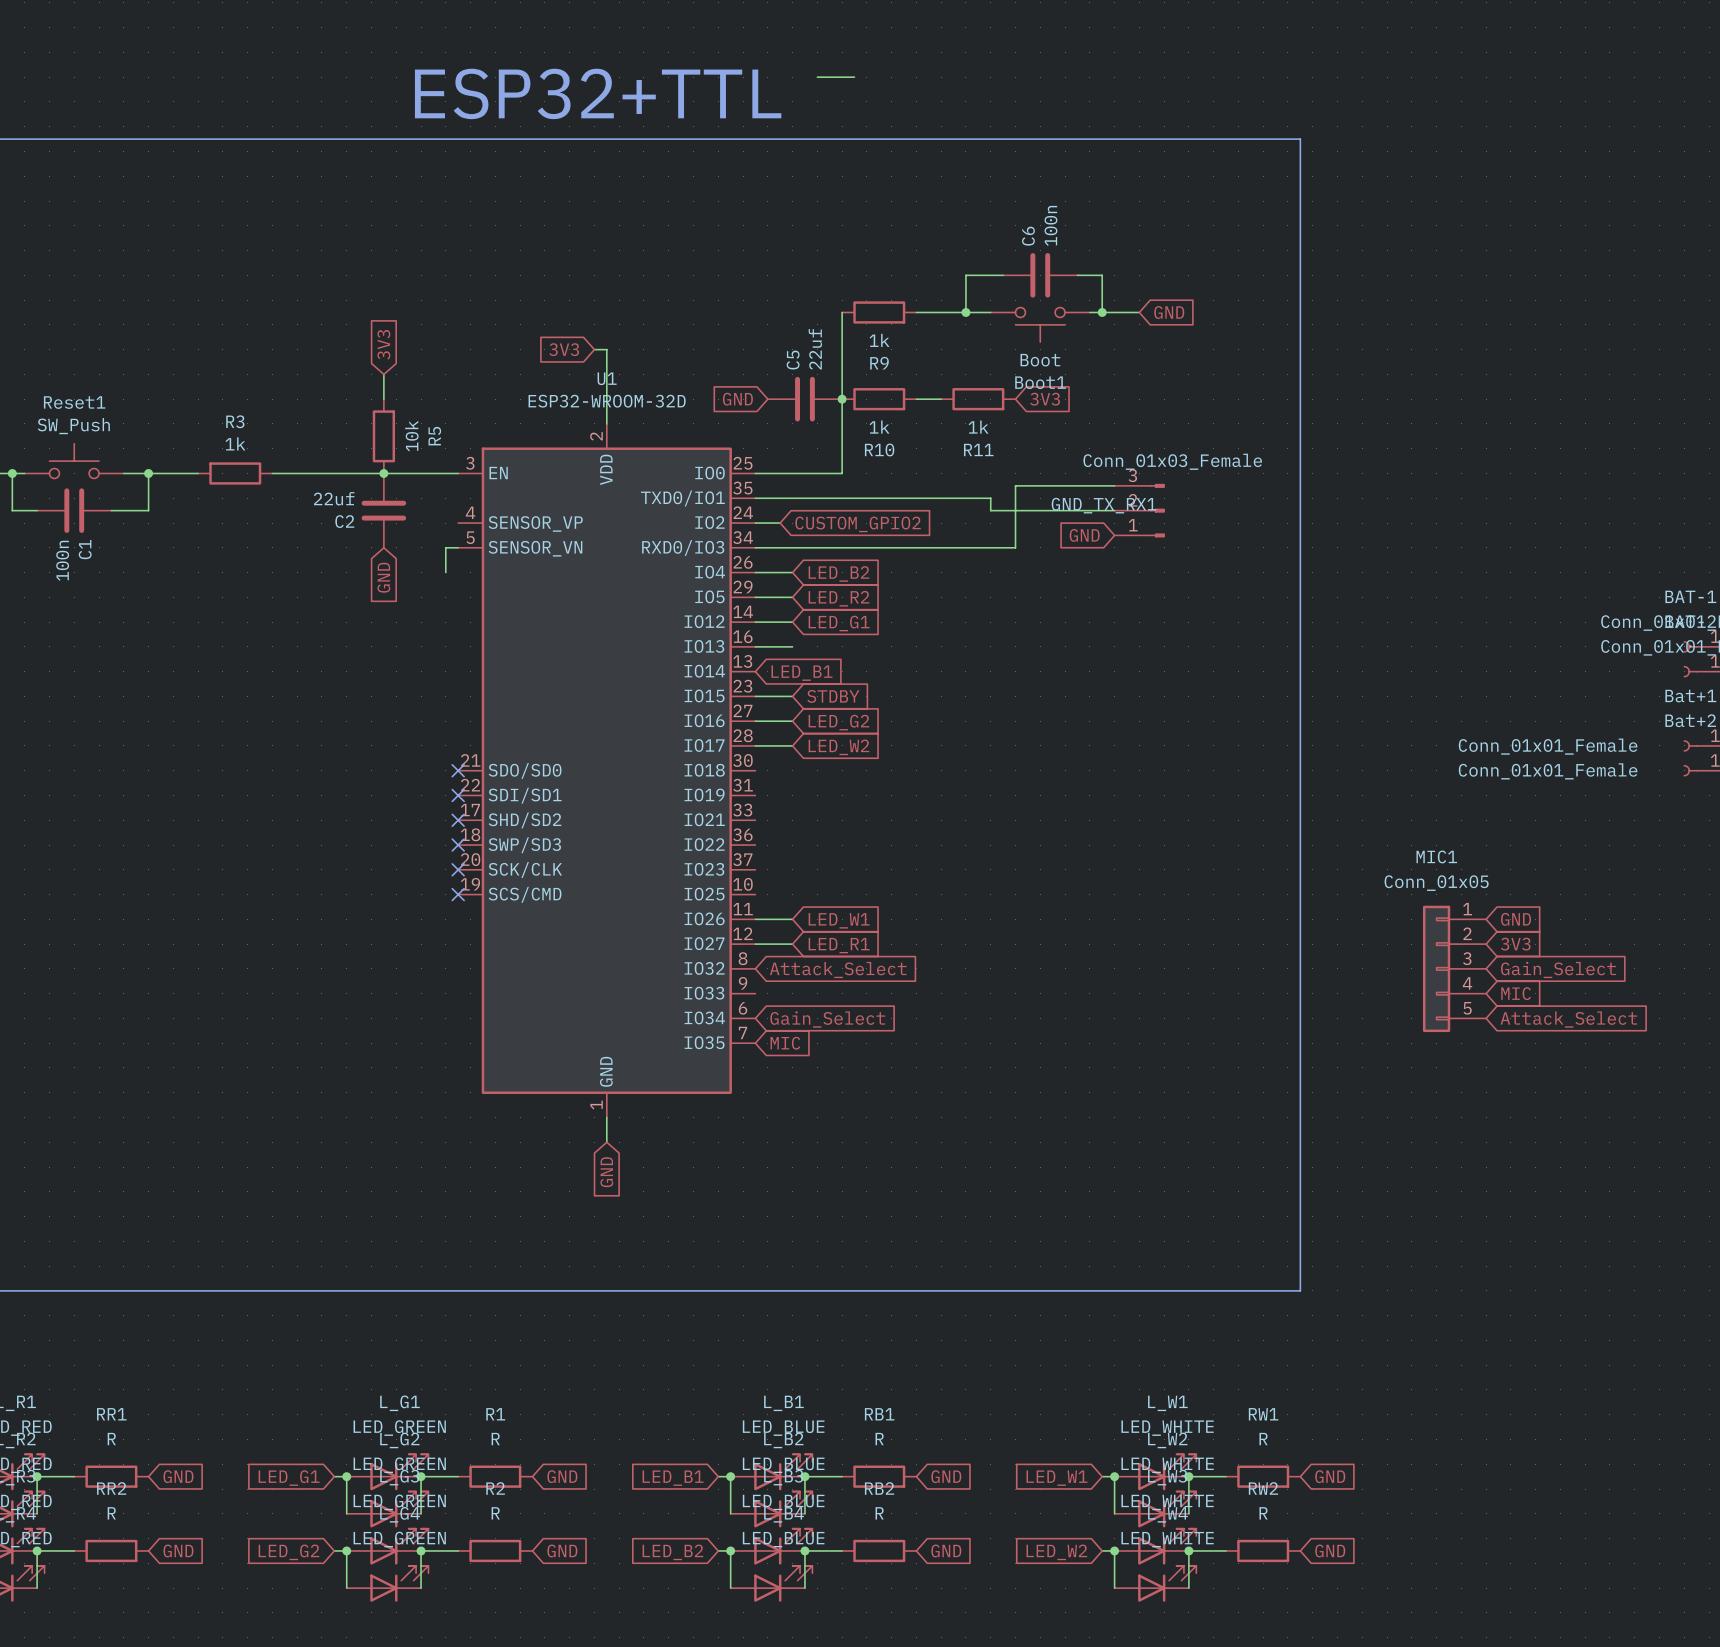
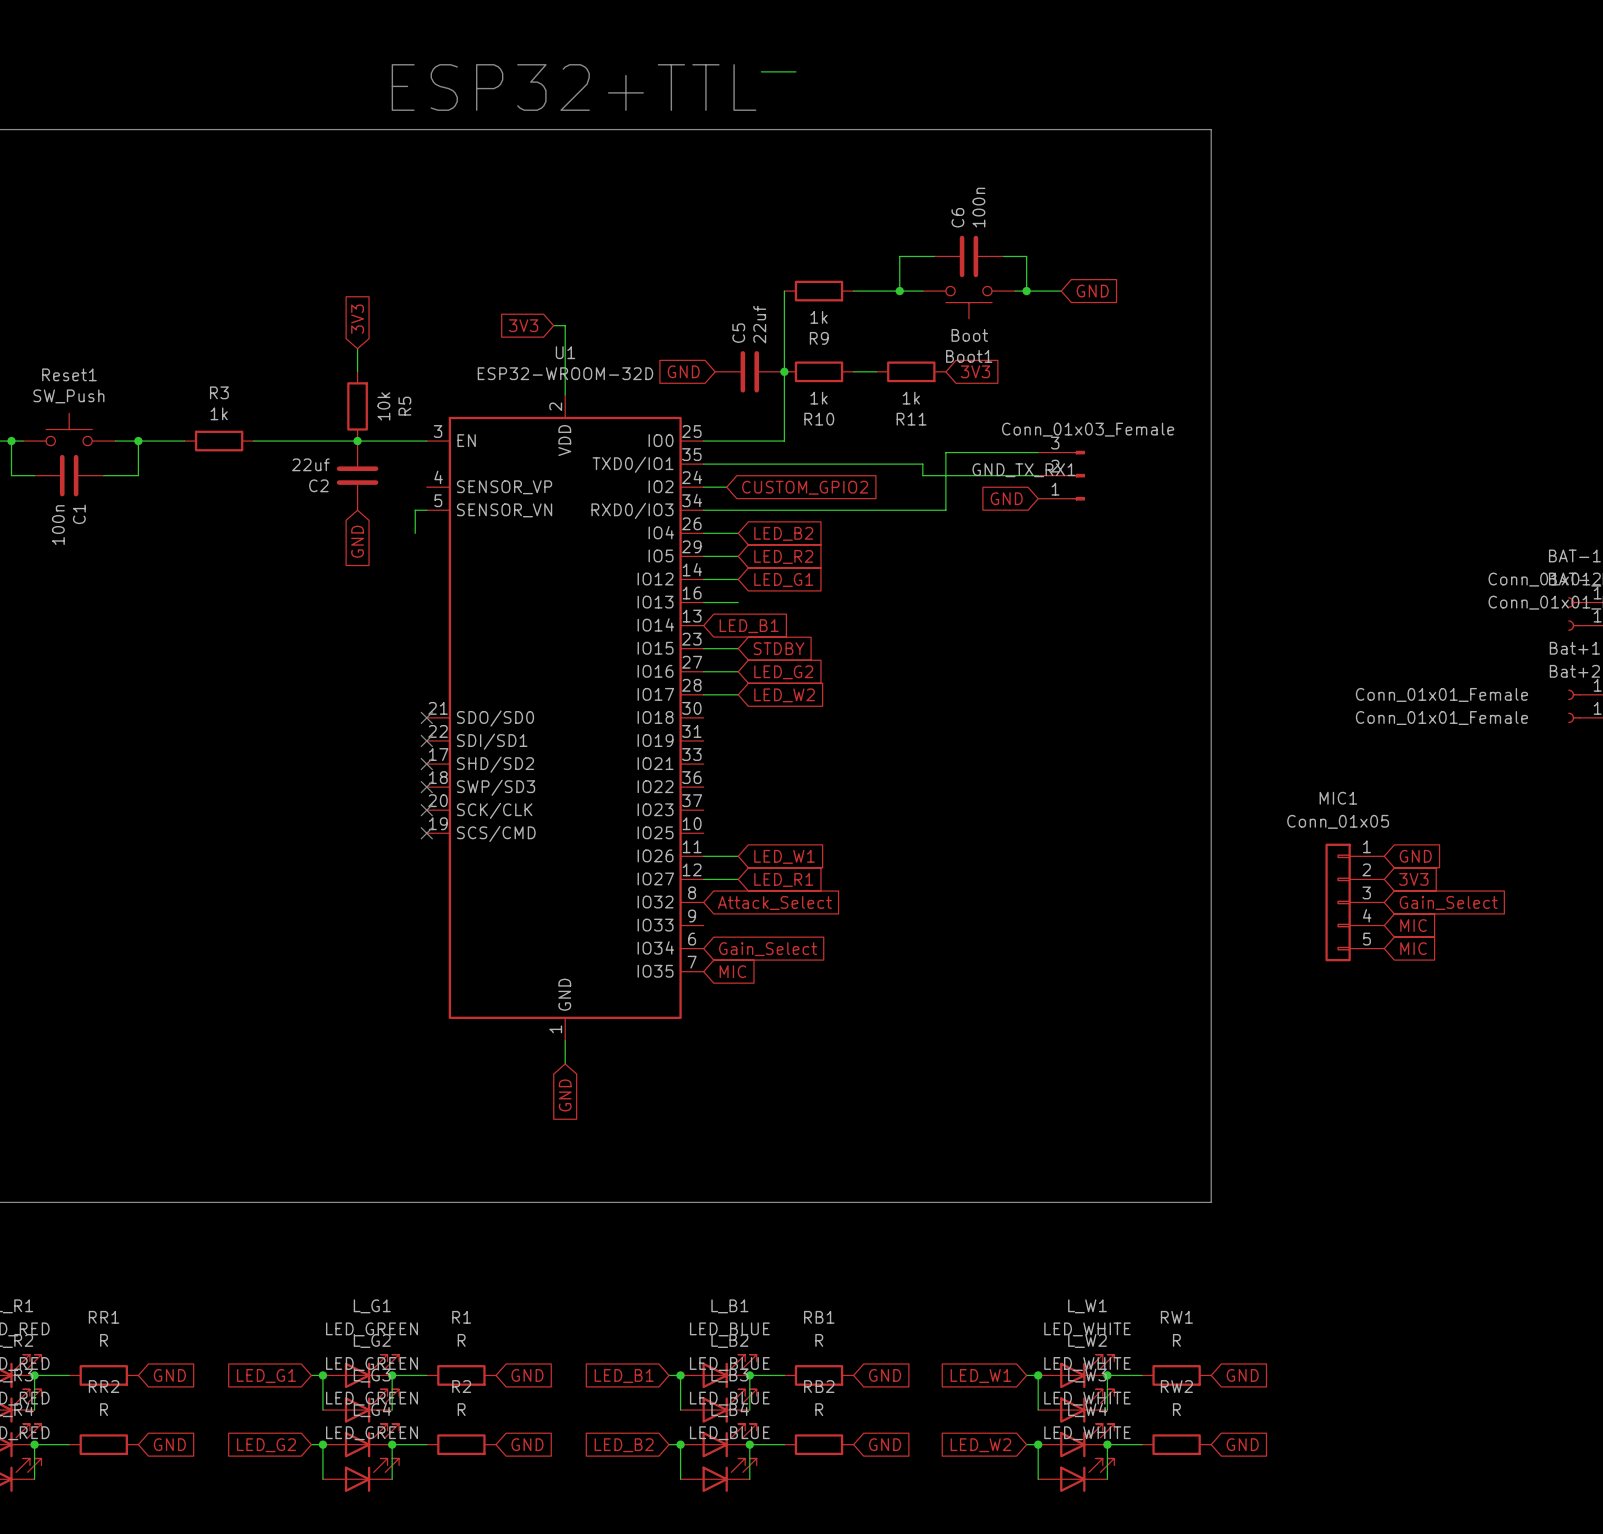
global label: Attack_Select (1568, 1019) -> MIC (1413, 948)

